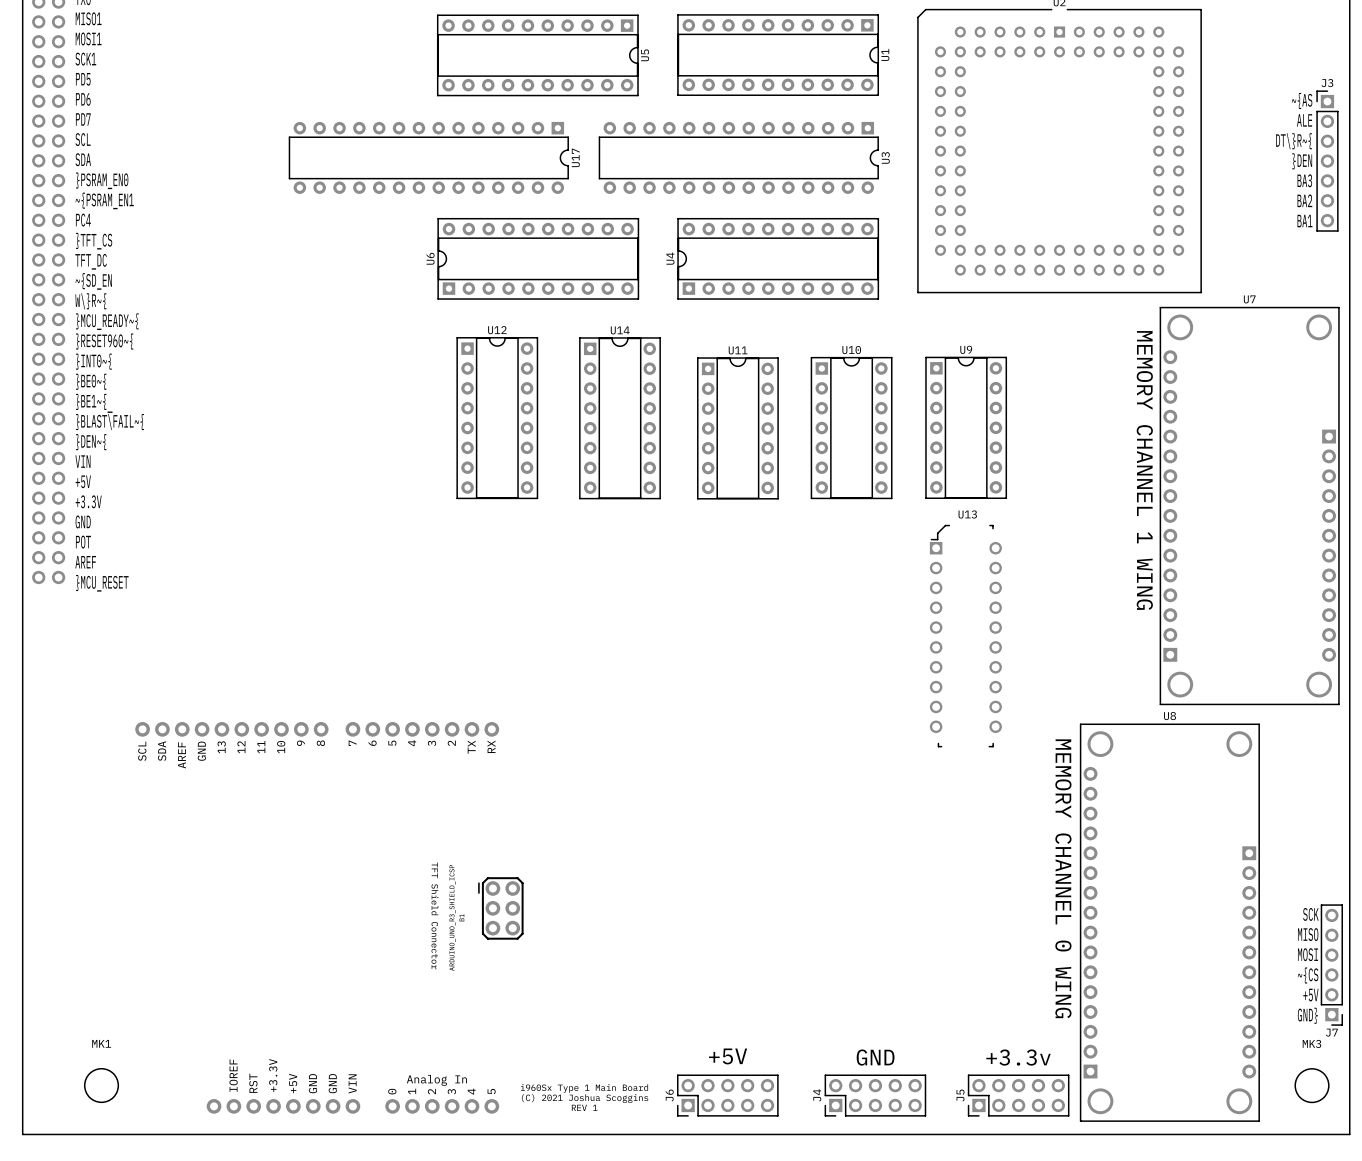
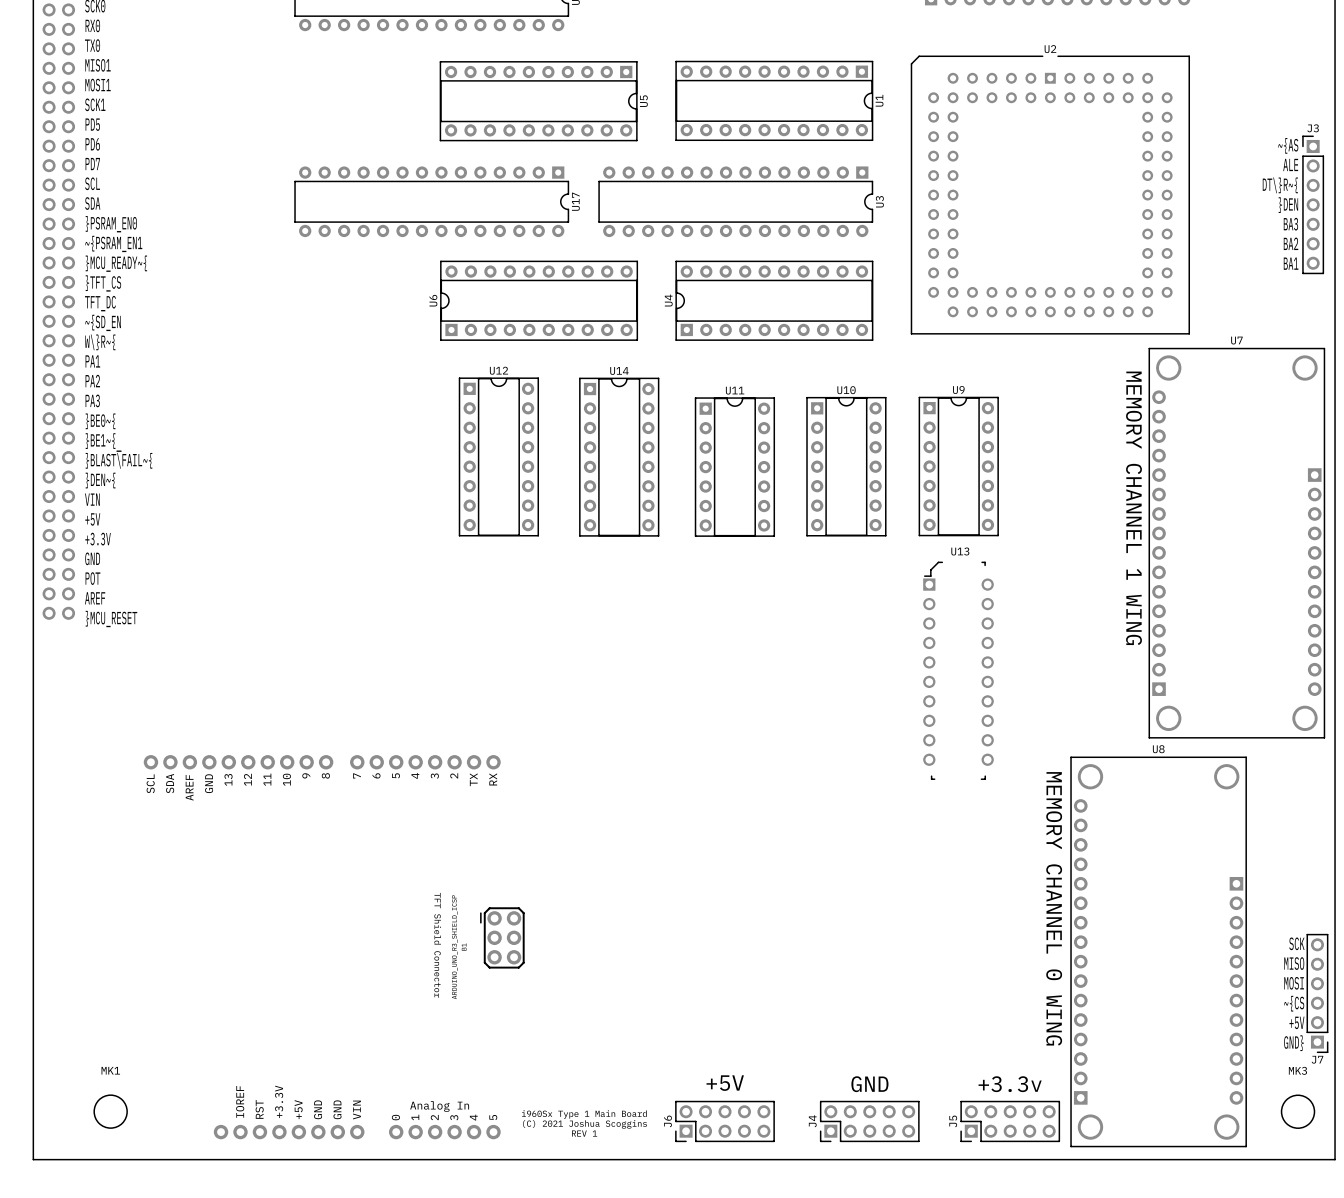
text: PC4 (83, 220) -> }MCU_READY~{ (116, 263)
text: }MCU_READY~{ (107, 321) -> PA1 (92, 361)
text: }RESET960~{ (104, 341) -> PA2 (92, 381)
text: }INT0~{ (93, 361) -> PA3 (92, 400)

